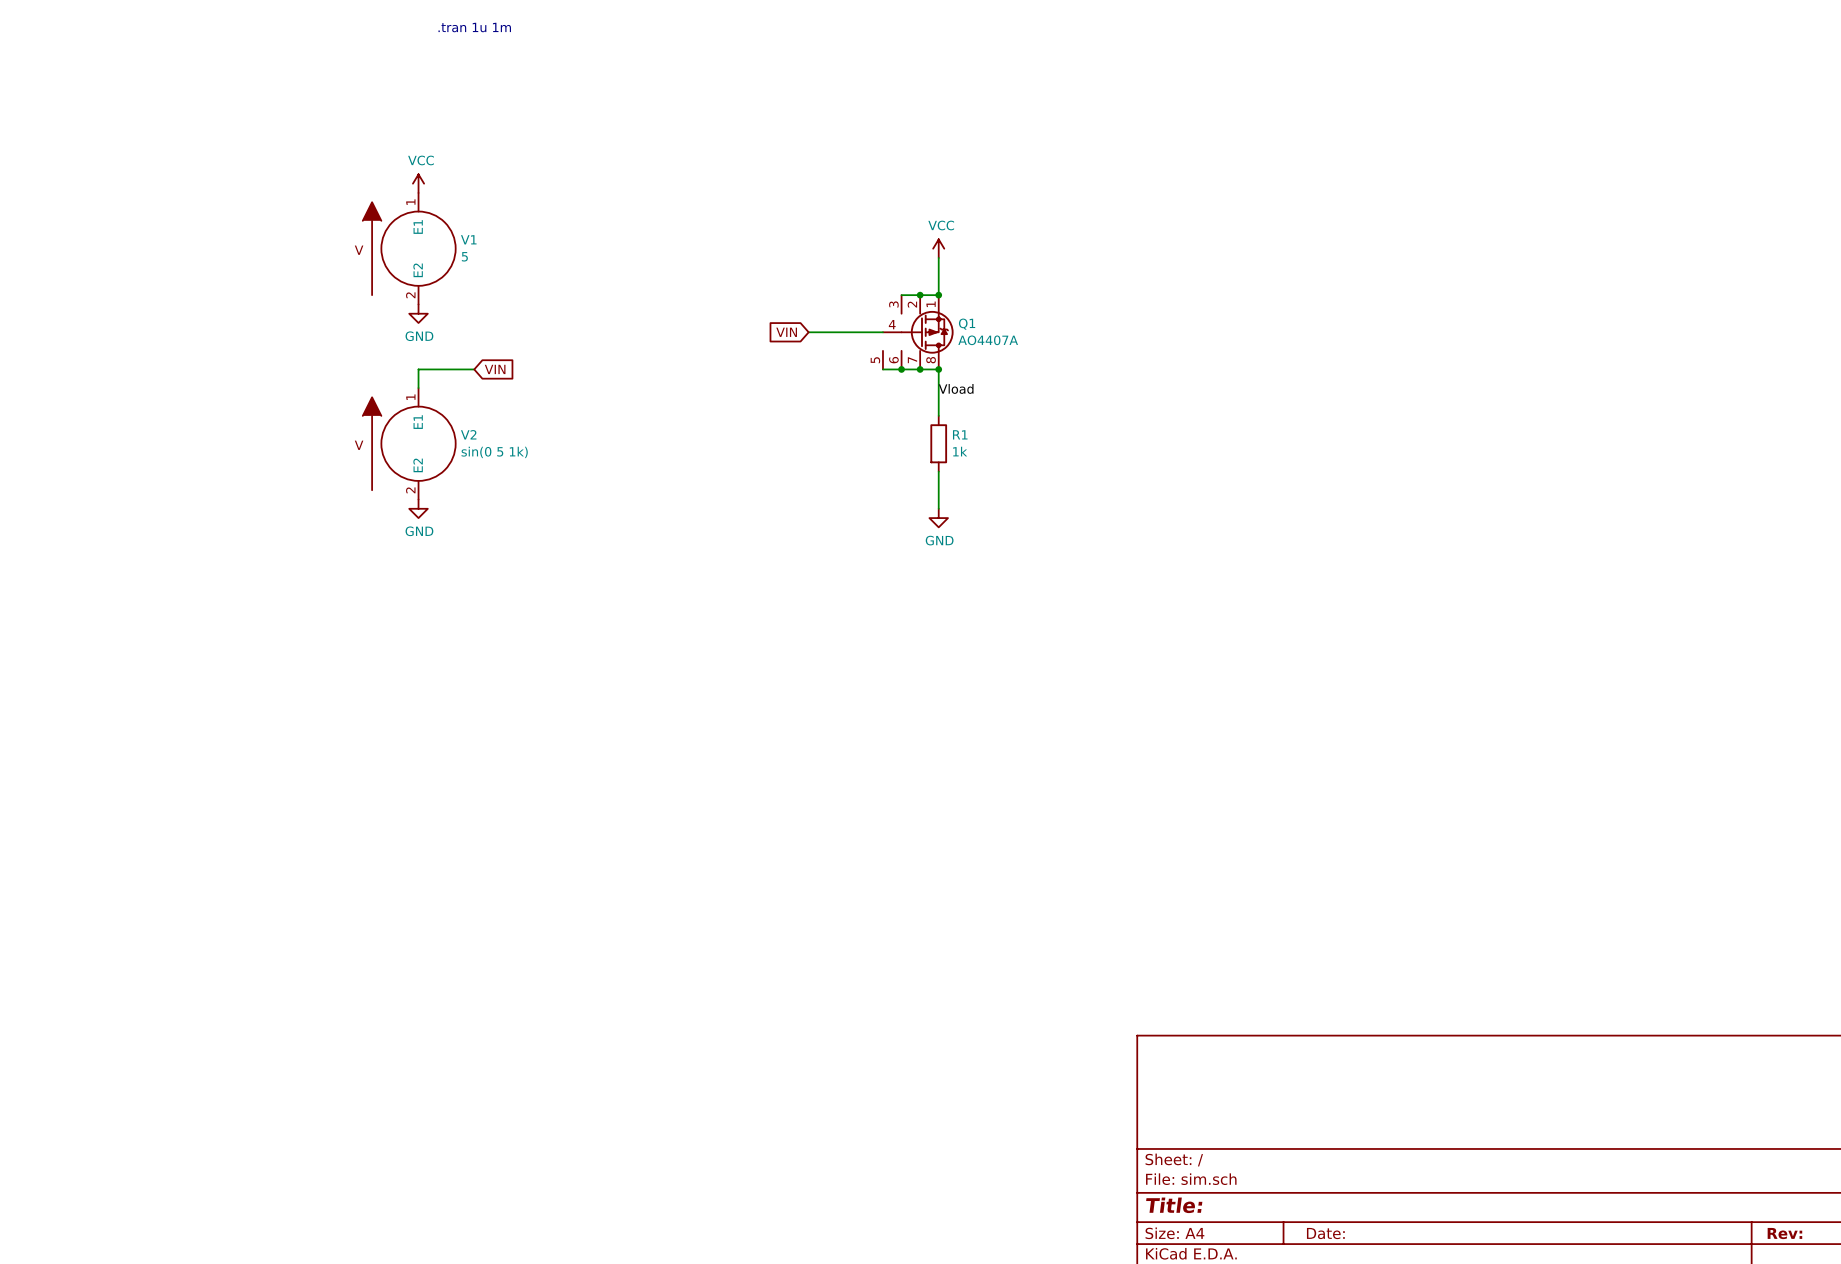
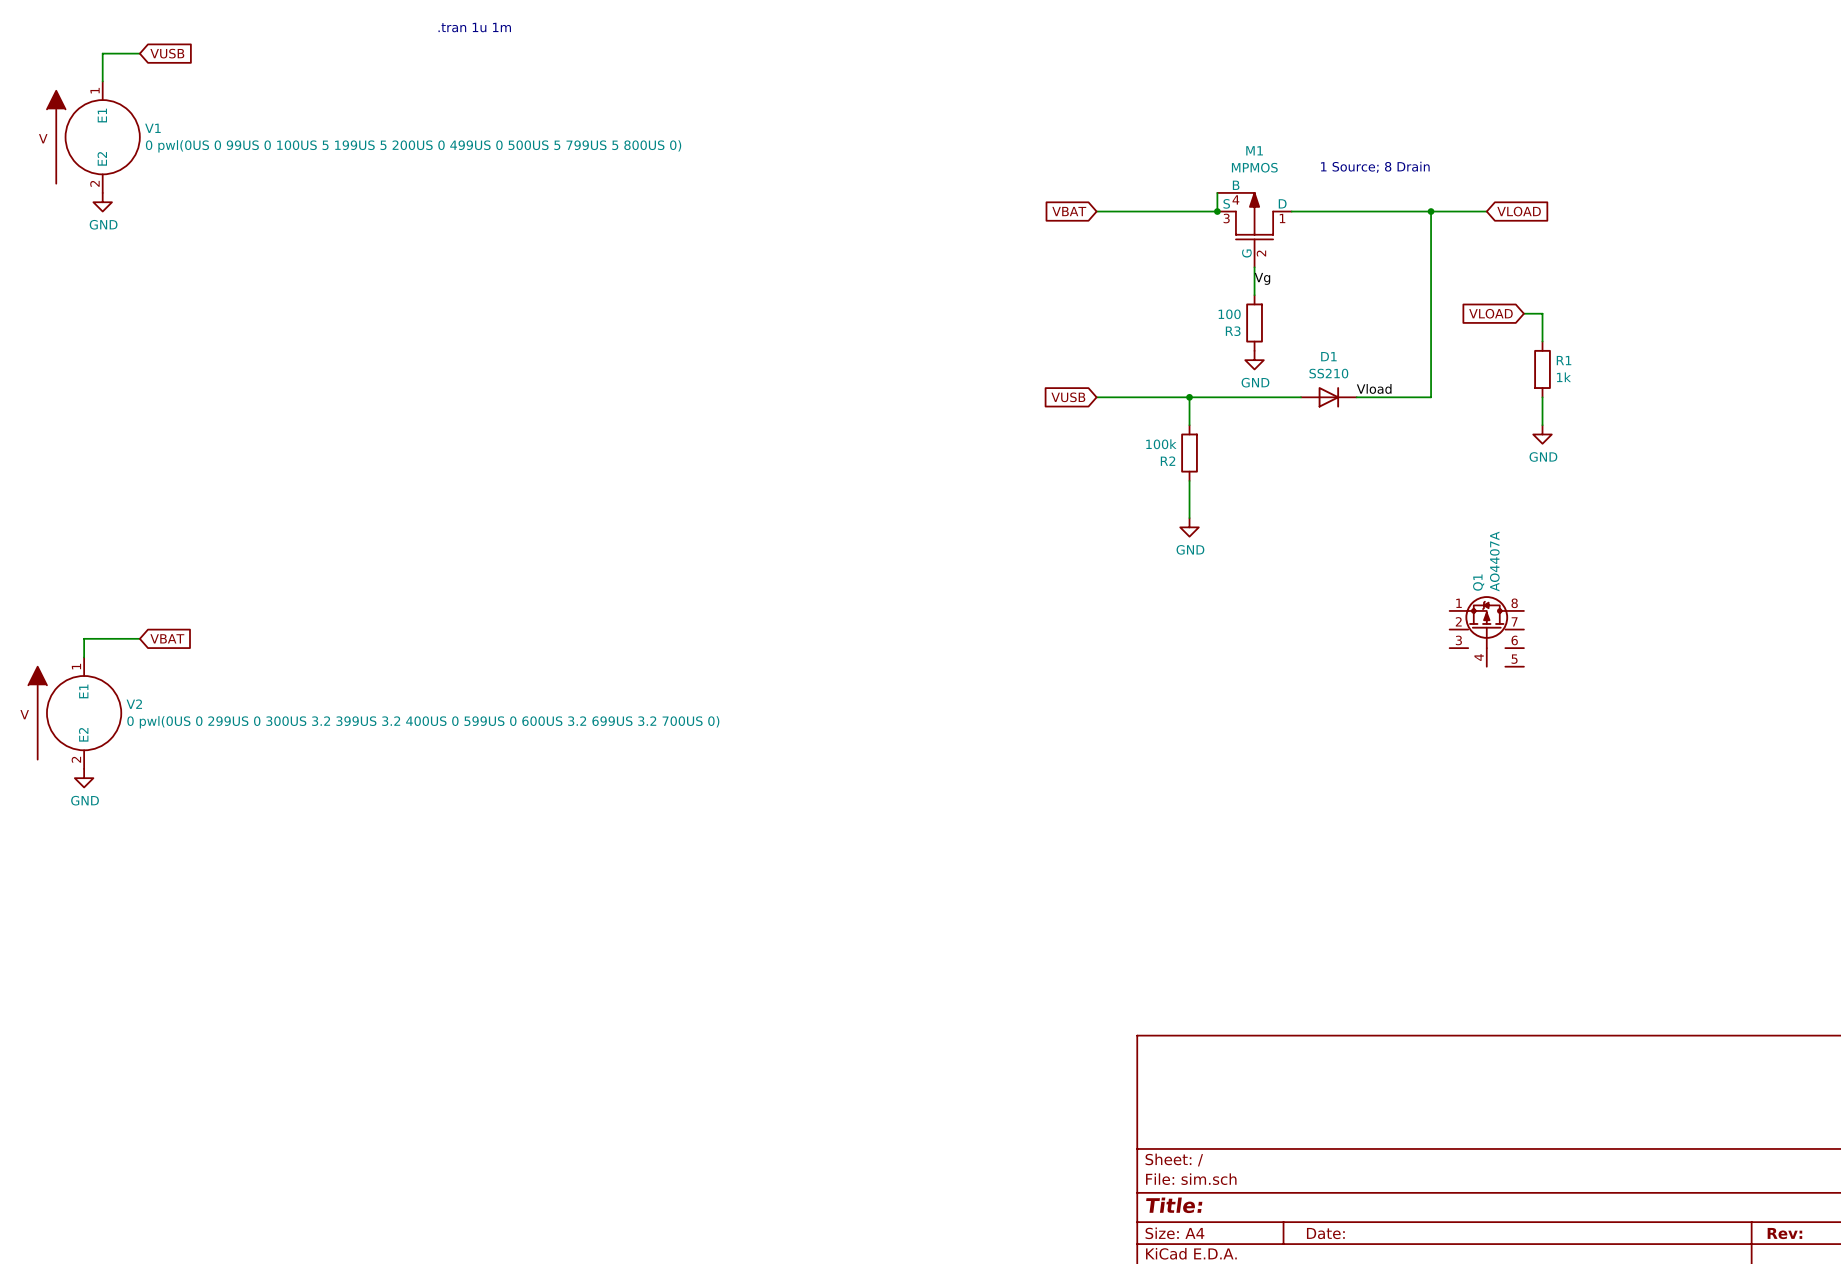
wire: none -> (139, 53) (102, 53) (102, 81)
global label: none -> VUSB (167, 53)
text: none -> 1 Source; 8 Drain (1375, 167)
power symbol: VCC (418, 183) -> none
wire: none -> (1217, 192) (1217, 211) (1096, 211)
power symbol: none -> GND (102, 202)
global label: none -> VBAT (1069, 211)
junction: none -> (1217, 211)
wire: none -> (1291, 211) (1486, 211)
wire: none -> (1431, 211) (1431, 397) (1356, 397)
junction: none -> (1431, 211)
global label: none -> VLOAD (1519, 211)
M1: none -> MPMOS (1254, 230)
V1 position: (409, 248) -> (93, 137)
power symbol: VCC (938, 248) -> none
V1 value: 5 (464, 256) -> 0 pwl(0US 0 99US 0 100US 5 199US 5 200US 0 499US 0 500US 5 799US 5 800US 0) (413, 146)
wire: (938, 257) (938, 295) (901, 295) -> none
wire: none -> (1254, 267) (1254, 295)
label: none -> Vg (1262, 278)
junction: (920, 295) -> none
junction: (938, 295) -> none
power symbol: GND (418, 313) -> none
global label: none -> VLOAD (1490, 313)
wire: none -> (1523, 313) (1542, 313) (1542, 341)
R3: none -> 100 (1254, 323)
global label: VIN (786, 332) -> none
wire: (808, 332) (882, 332) -> none
Q1 position: (918, 332) -> (1486, 631)
Q1 rotation: 0° (927, 332) -> 90° counterclockwise (1486, 622)
power symbol: none -> GND (1254, 360)
wire: (474, 369) (418, 369) (418, 388) -> none
global label: VIN (495, 369) -> none
wire: (882, 369) (938, 369) (938, 415) -> none
junction: (901, 369) -> none
junction: (920, 369) -> none
junction: (938, 369) -> none
label: Vload (956, 388) -> none
label: none -> Vload (1374, 388)
global label: none -> VUSB (1068, 397)
wire: none -> (1096, 397) (1300, 397)
wire: none -> (1189, 397) (1189, 425)
junction: none -> (1189, 397)
D1: none -> SS210 (1328, 397)
wire: none -> (1542, 397) (1542, 425)
power symbol: none -> GND (1542, 434)
V2 position: (409, 443) -> (74, 713)
R1 position: (938, 443) -> (1542, 369)
V2 value: sin(0 5 1k) (494, 452) -> 0 pwl(0US 0 299US 0 300US 3.2 399US 3.2 400US 0 599US 0 600US 3.2 699US 3.2 700US 0) (423, 722)
R2: none -> 100k (1189, 453)
wire: (938, 471) (938, 508) -> none
wire: none -> (1189, 480) (1189, 518)
power symbol: GND (418, 508) -> none
power symbol: GND (938, 518) -> none
power symbol: none -> GND (1189, 527)
wire: none -> (139, 638) (84, 638) (84, 657)
global label: none -> VBAT (167, 638)
power symbol: none -> GND (84, 778)

